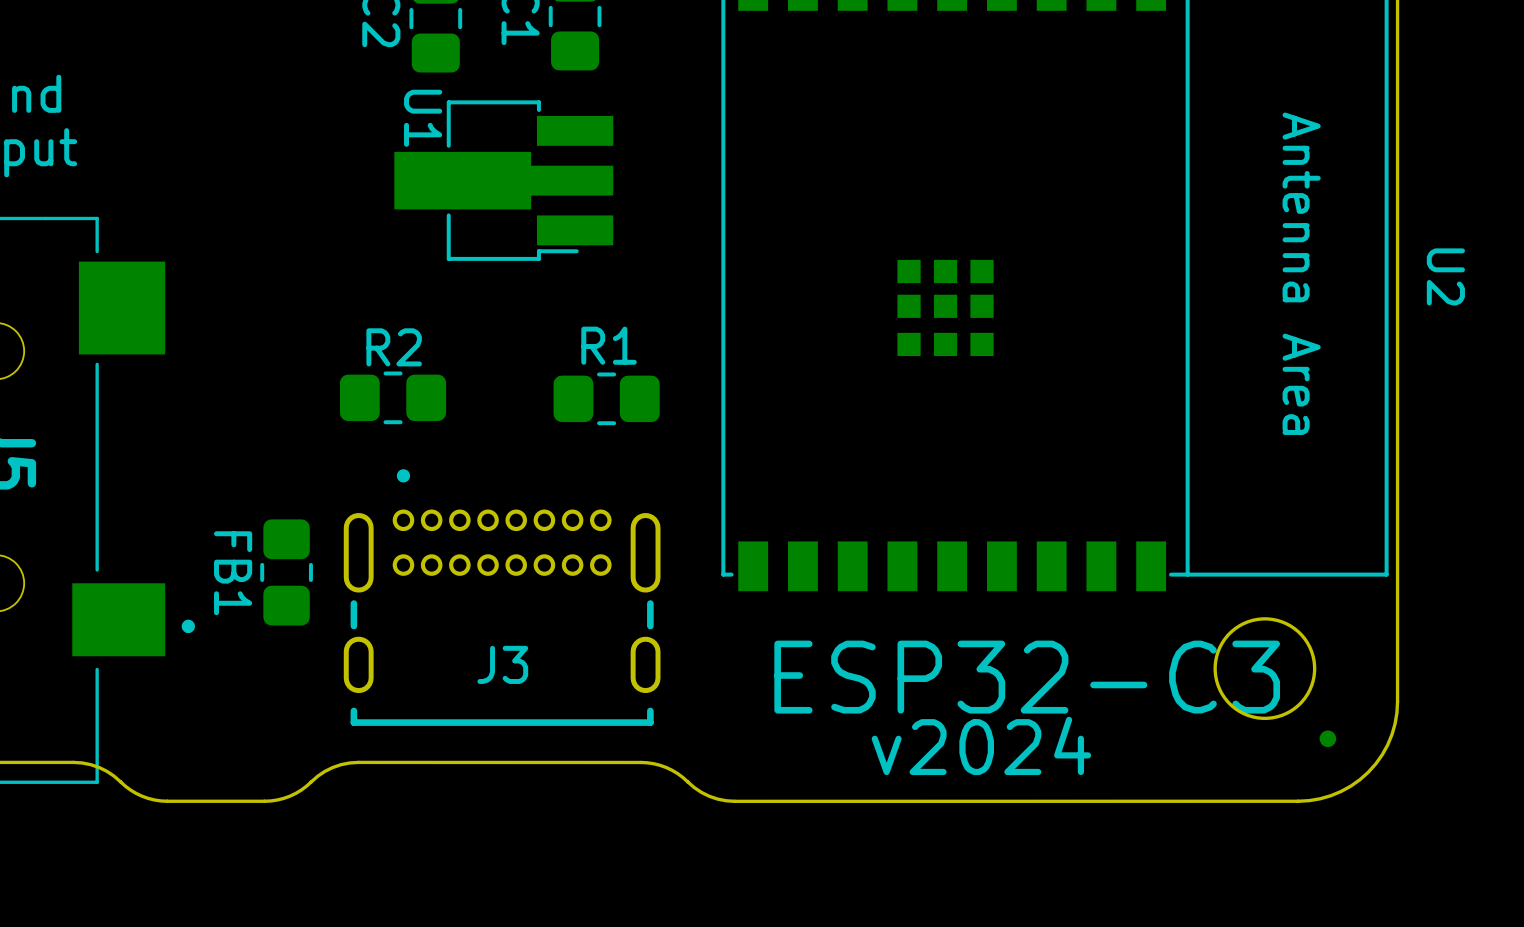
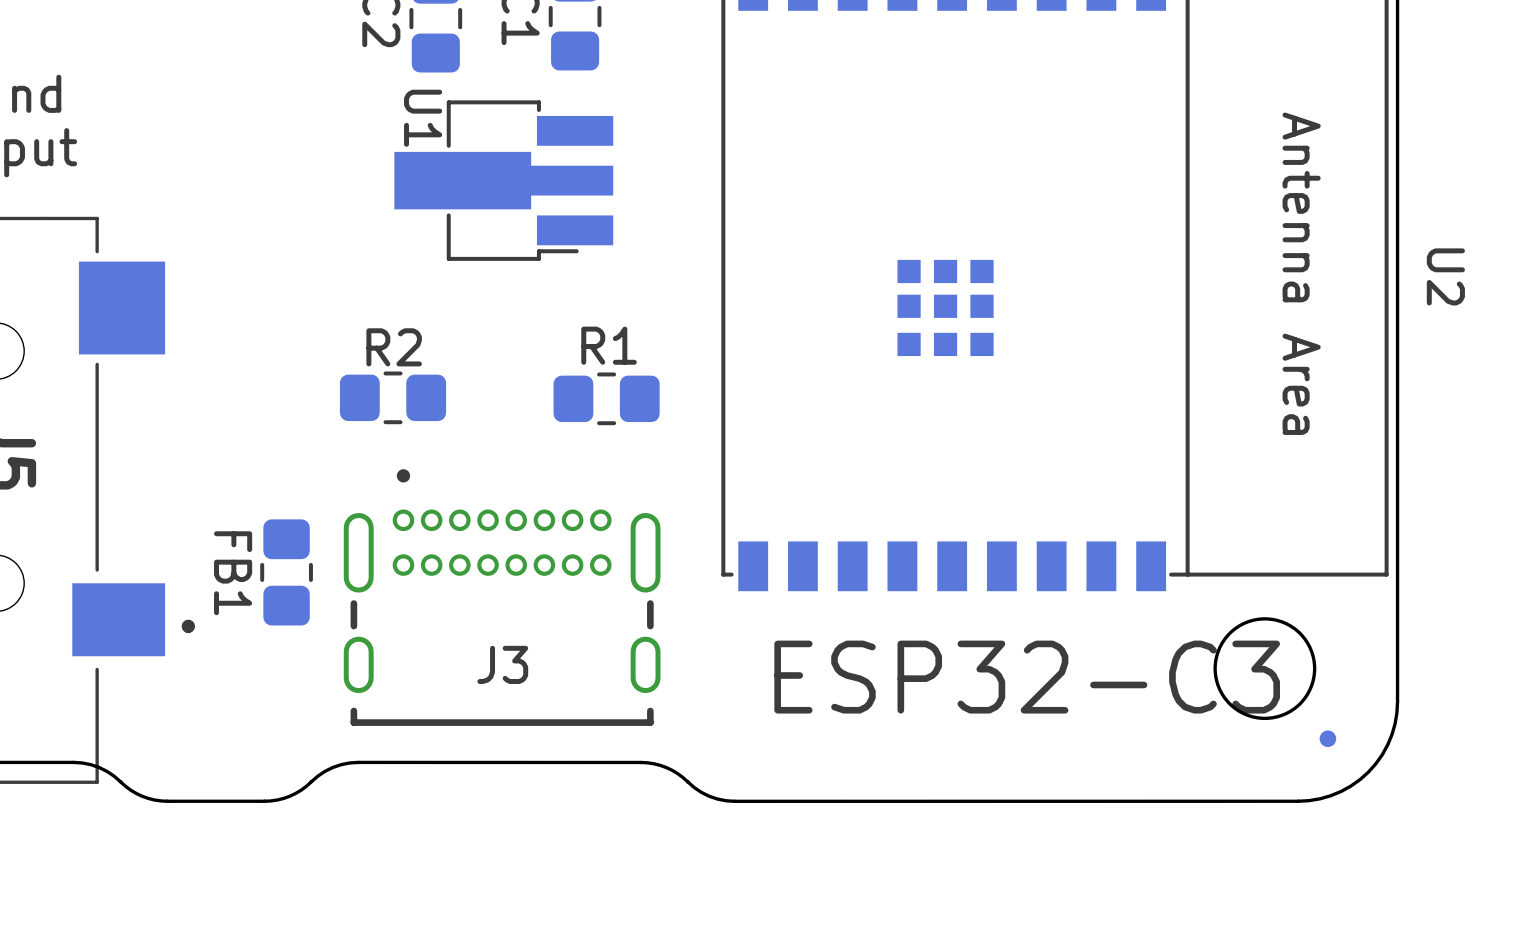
text: v2024 (981, 745) -> none

